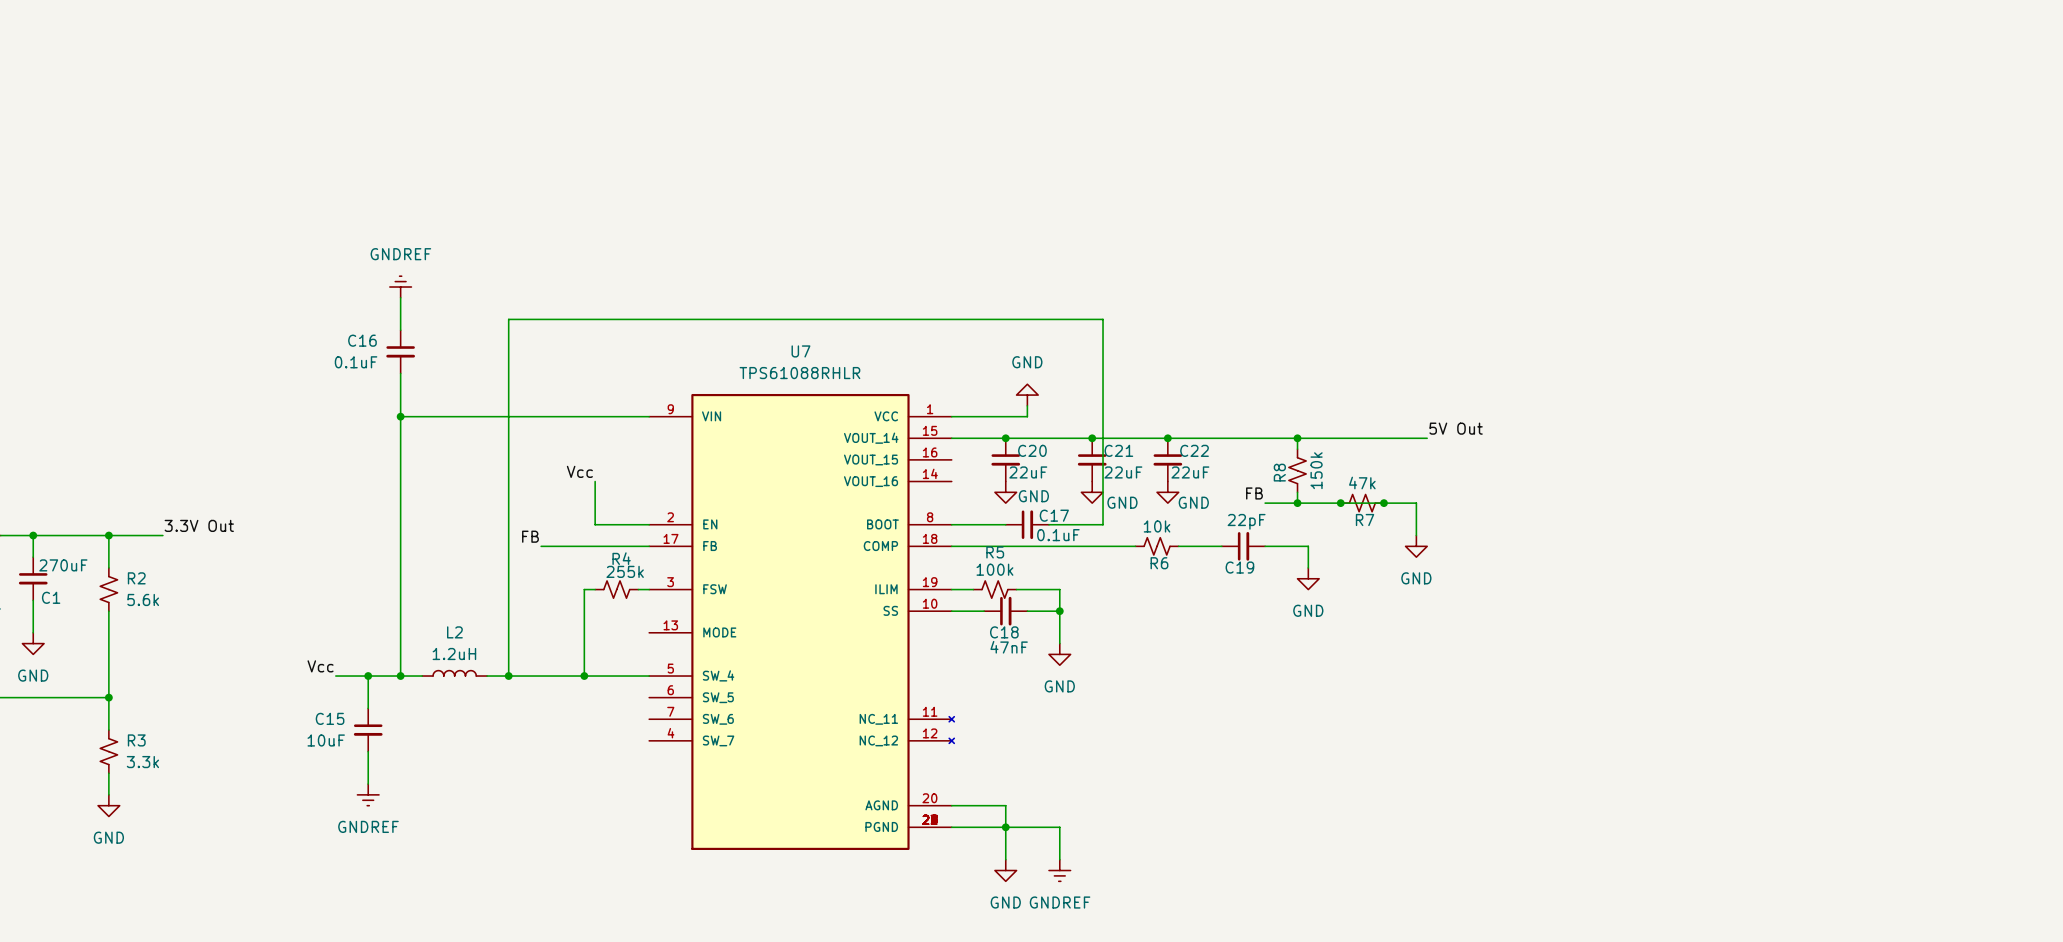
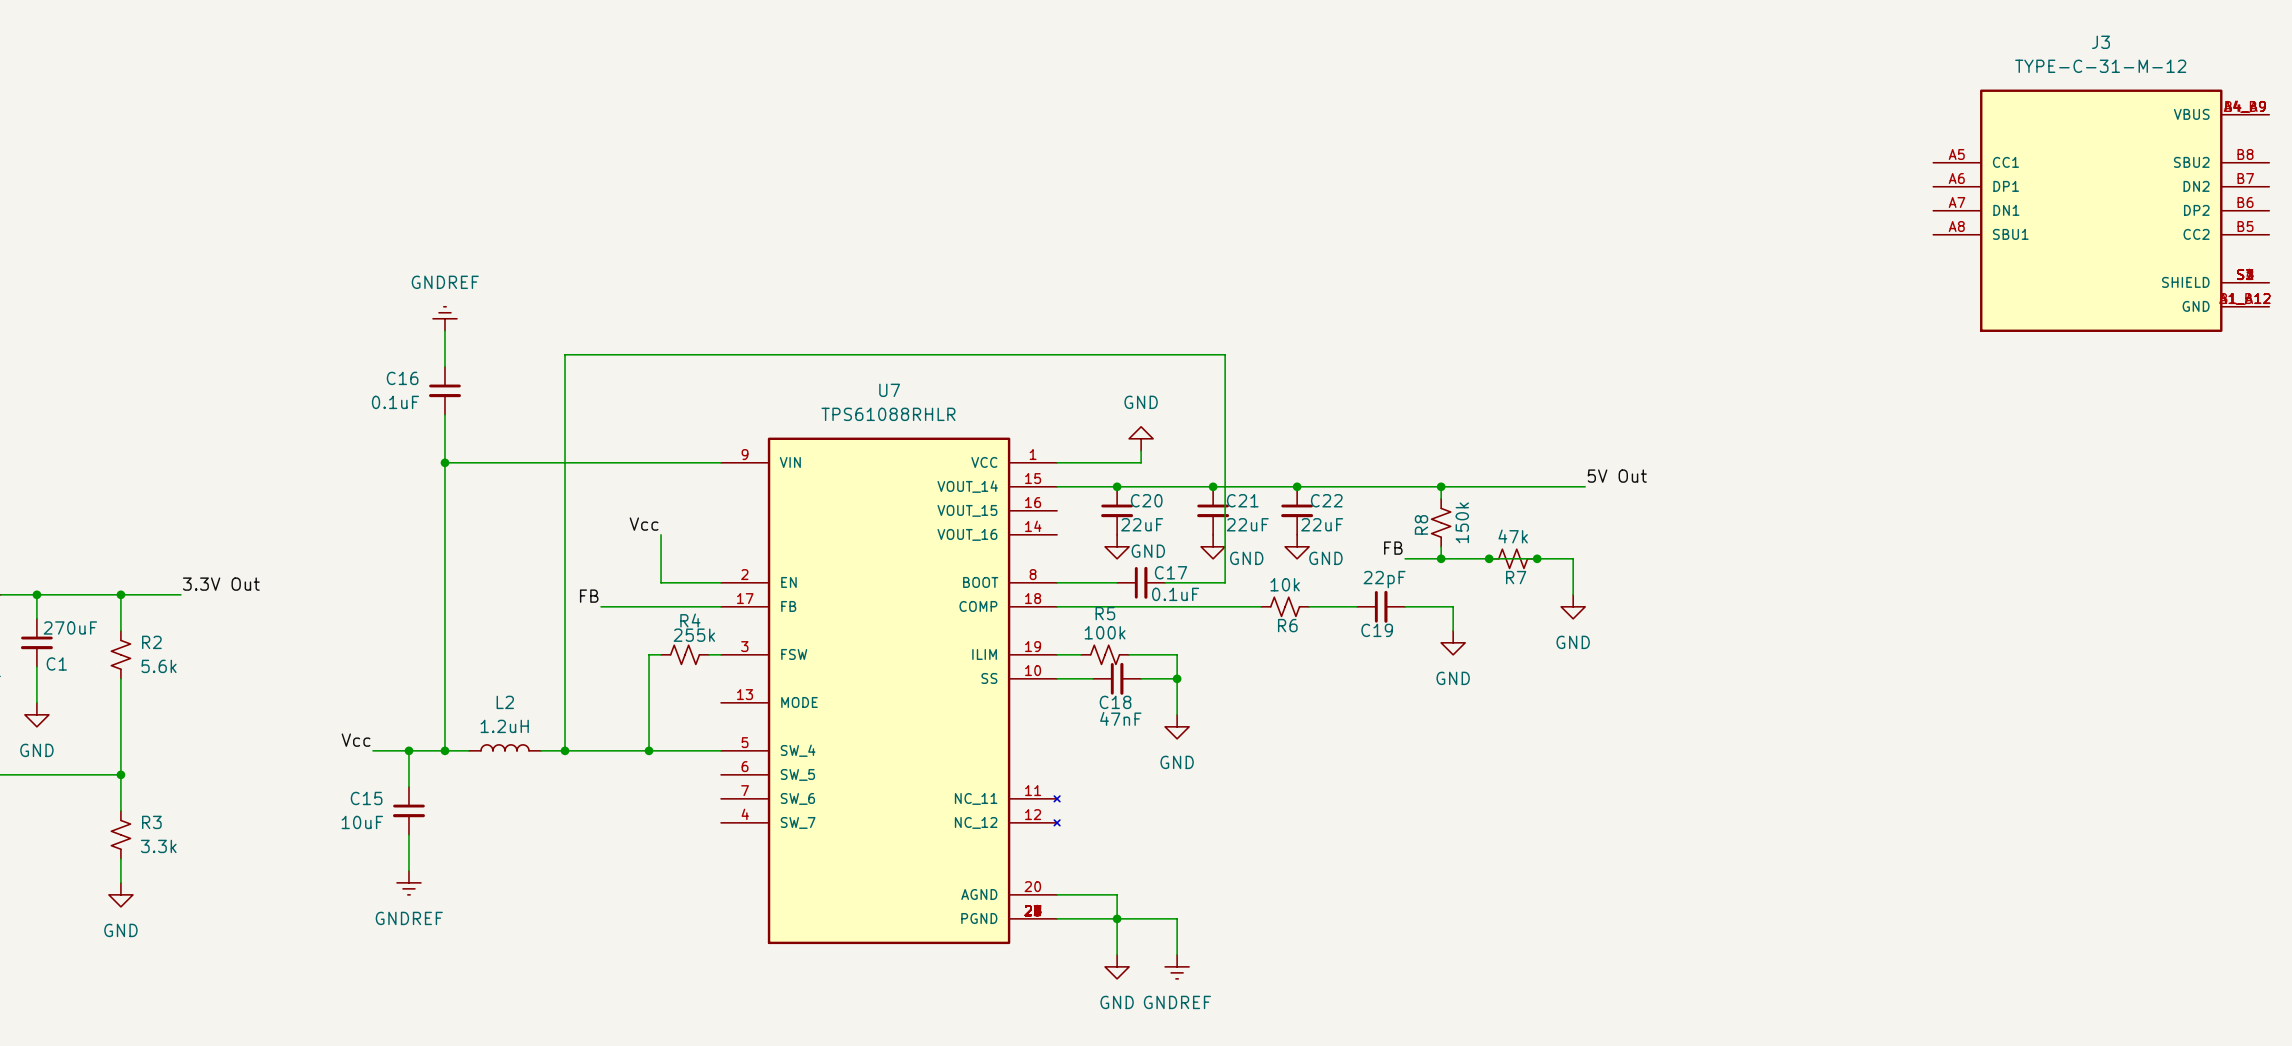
J3: none -> TYPE-C-31-M-12 (2101, 210)

